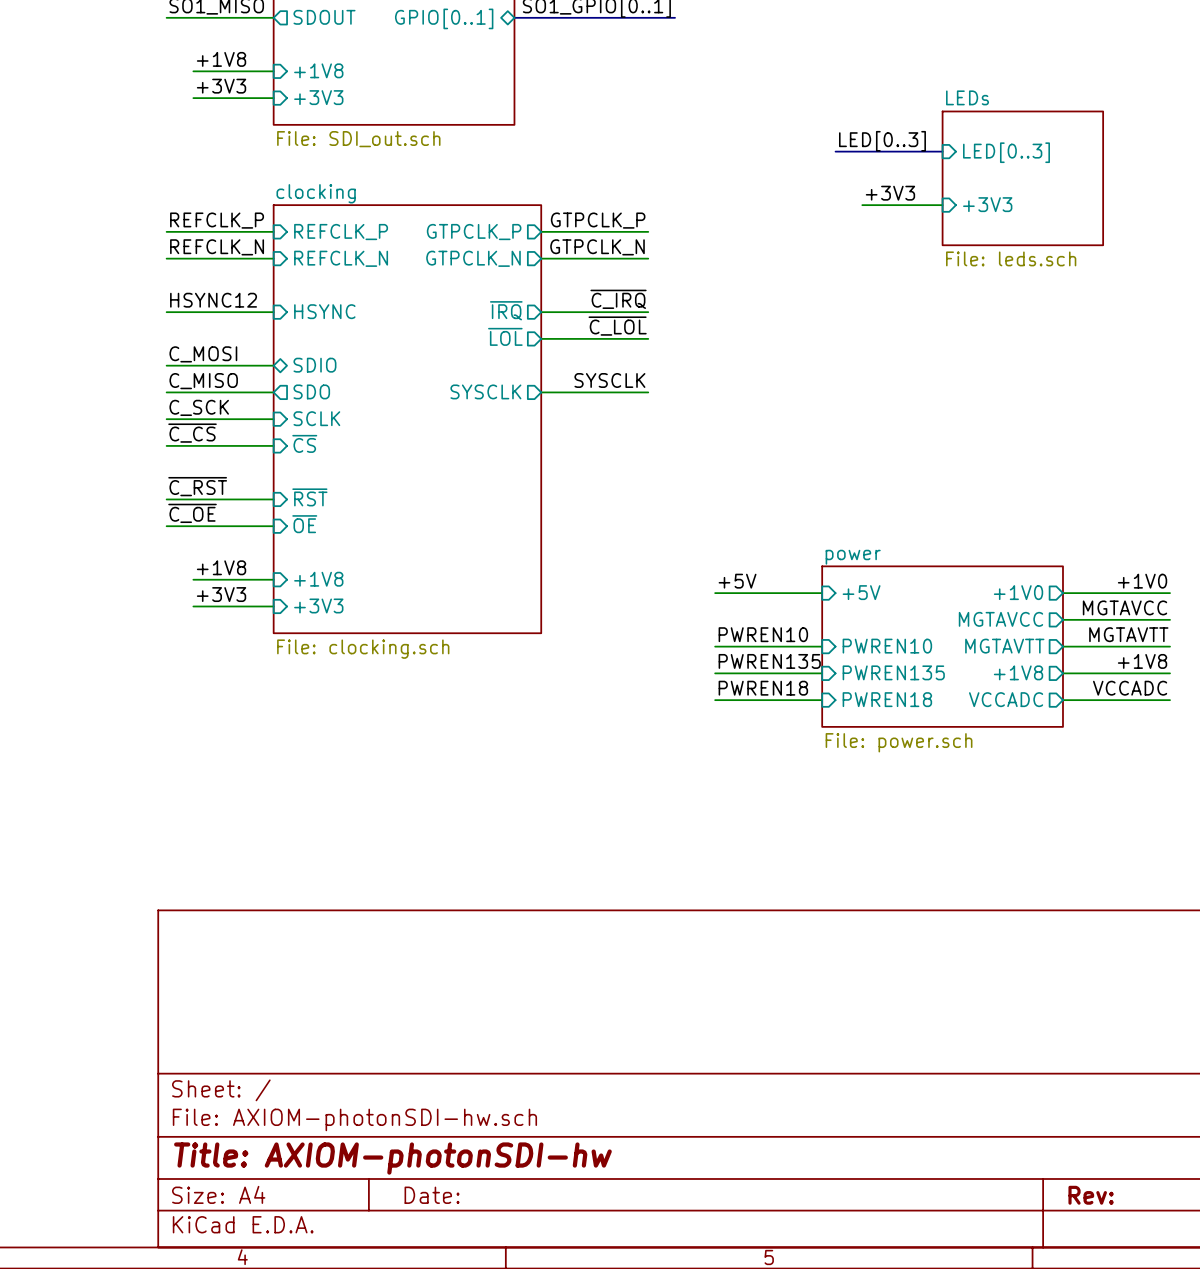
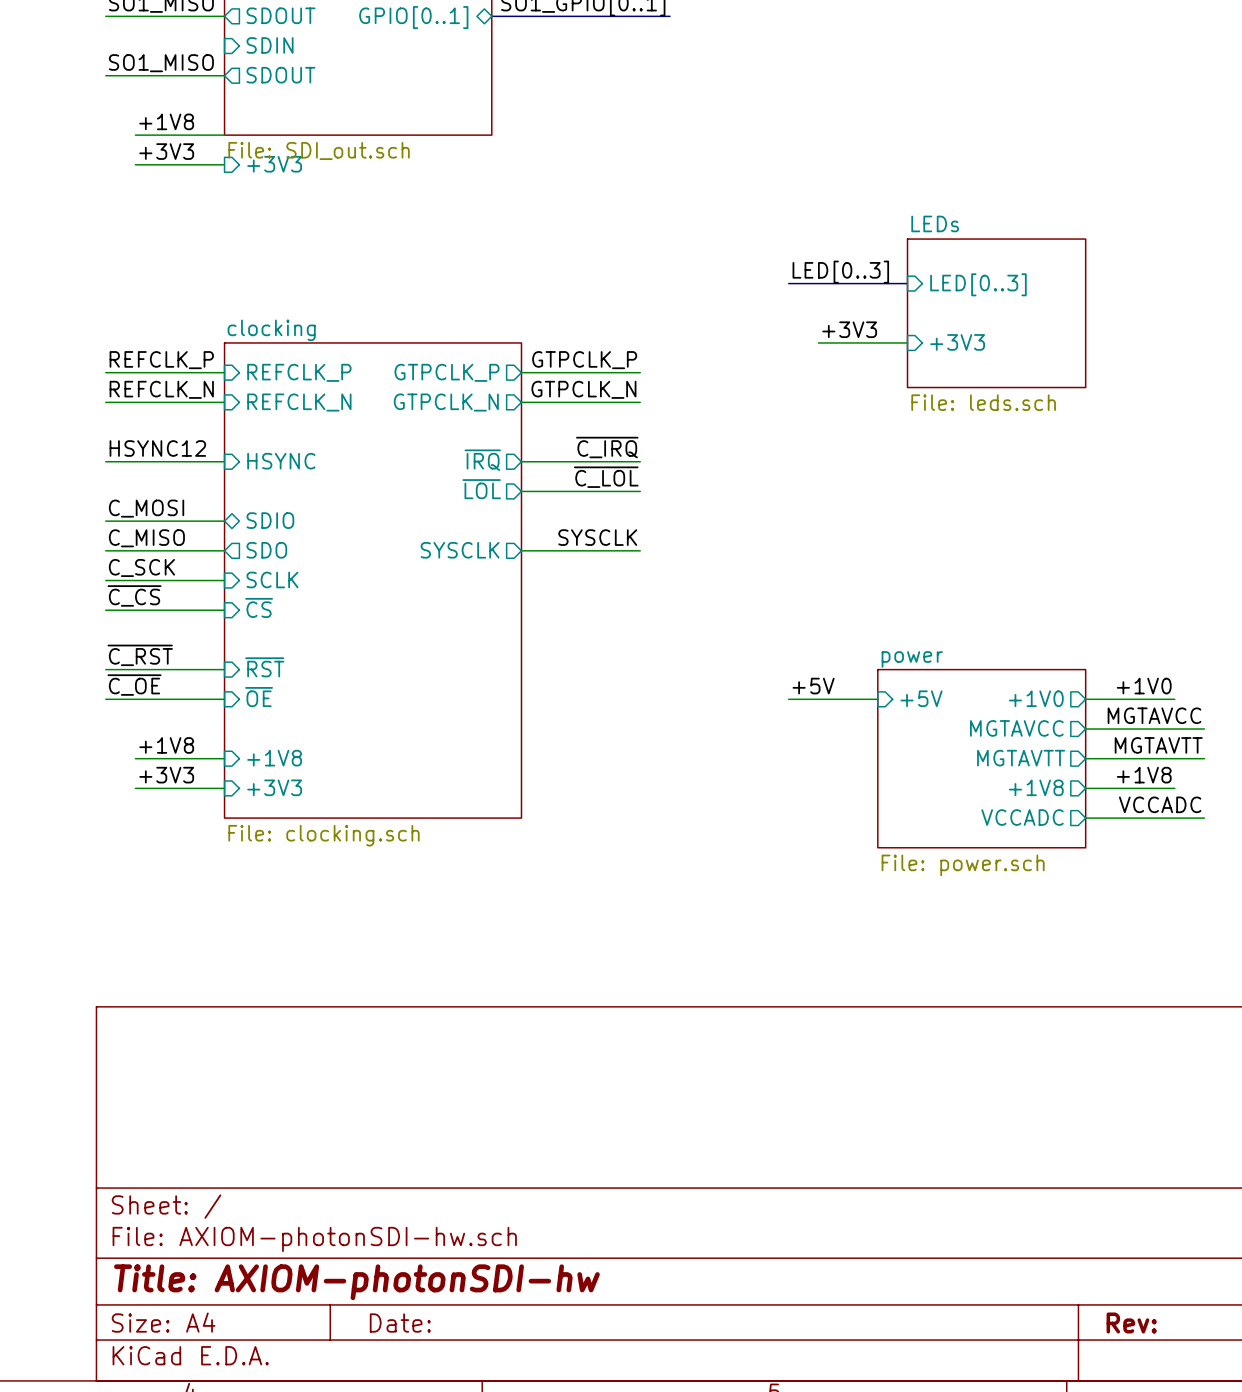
sheet pin: none -> SDIN (270, 45)
label position: +1V8 (221, 59) -> +1V8 (166, 121)
label: none -> SO1_MISO (161, 63)
sheet pin shape: input (318, 70) -> output (280, 75)
sheet pin: +1V8 (318, 70) -> SDOUT (280, 75)
wire: none -> (105, 75) (135, 75)
label position: +3V3 (221, 86) -> +3V3 (166, 151)
sheet pin position: +3V3 (318, 97) -> +3V3 (274, 164)
wire: (193, 98) (273, 98) -> (135, 135) (224, 135)
label position: LED[0..3] (882, 141) -> LED[0..3] (840, 272)
wire: none -> (135, 164) (224, 164)
bus: (835, 151) (942, 151) -> (788, 283) (907, 283)
sheet pin position: LED[0..3] (1006, 152) -> LED[0..3] (978, 284)
sheet LEDs position: (1022, 178) -> (996, 313)
label position: +3V3 (890, 193) -> +3V3 (849, 329)
sheet pin position: +3V3 (987, 204) -> +3V3 (957, 342)
wire: (862, 205) (942, 205) -> (818, 342) (907, 342)
label position: REFCLK_P (217, 220) -> REFCLK_P (161, 360)
label: GTPCLK_P (598, 220) -> none
wire: (166, 231) (273, 231) -> (105, 372) (224, 372)
wire: (541, 231) (648, 231) -> (521, 491) (640, 491)
sheet pin position: REFCLK_P (341, 232) -> REFCLK_P (299, 372)
sheet pin: GTPCLK_P (474, 232) -> none
label: REFCLK_N (217, 247) -> none
label position: GTPCLK_N (597, 247) -> GTPCLK_N (583, 389)
wire: (166, 258) (273, 258) -> none
sheet pin: REFCLK_N (341, 258) -> none
sheet pin position: GTPCLK_N (473, 258) -> GTPCLK_N (446, 402)
wire: (541, 258) (648, 258) -> (521, 402) (640, 402)
label position: ~{C_IRQ} (618, 299) -> ~{C_IRQ} (607, 447)
label: HSYNC12 (213, 300) -> none
sheet pin position: ~{IRQ} (506, 310) -> ~{IRQ} (482, 460)
sheet pin: HSYNC (324, 311) -> none
wire: (166, 312) (273, 312) -> (105, 521) (224, 521)
wire: (541, 312) (648, 312) -> (521, 461) (640, 461)
label: ~{C_LOL} (617, 326) -> GTPCLK_P (584, 360)
sheet pin: ~{LOL} (505, 336) -> GTPCLK_P (447, 372)
label: C_MOSI (203, 354) -> REFCLK_N (161, 389)
sheet pin shape: bidirectional (314, 365) -> input (299, 402)
sheet pin: SDIO (314, 365) -> REFCLK_N (299, 402)
label position: SYSCLK (609, 380) -> SYSCLK (597, 537)
label: C_MISO (203, 381) -> none
sheet pin: SDO (311, 391) -> none
sheet pin position: SYSCLK (485, 391) -> SYSCLK (460, 550)
wire: (166, 392) (273, 392) -> (105, 699) (224, 699)
wire: (541, 392) (648, 392) -> (521, 550) (640, 550)
label: C_SCK (199, 407) -> HSYNC12 (157, 448)
sheet pin: SCLK (316, 418) -> HSYNC (281, 461)
sheet clocking position: (407, 419) -> (373, 580)
label position: ~{C_CS} (192, 433) -> ~{C_CS} (134, 595)
label: none -> ~{C_LOL} (606, 477)
sheet pin position: ~{CS} (304, 443) -> ~{CS} (259, 607)
sheet pin: none -> ~{LOL} (481, 489)
wire: (166, 445) (273, 445) -> (105, 610) (224, 610)
label: none -> C_MOSI (146, 508)
sheet pin: none -> SDIO (270, 520)
label: ~{C_RST} (197, 486) -> C_MISO (146, 538)
sheet pin shape: input (309, 497) -> output (266, 550)
sheet pin: ~{RST} (309, 497) -> SDO (266, 550)
label: ~{C_OE} (192, 513) -> C_SCK (141, 567)
sheet pin: ~{OE} (304, 524) -> SCLK (272, 579)
label position: +1V8 (221, 567) -> +1V8 (166, 745)
wire: (193, 579) (273, 579) -> (135, 758) (224, 758)
sheet pin position: +1V8 (318, 579) -> +1V8 (274, 758)
label position: +5V (737, 581) -> +5V (813, 686)
label position: +1V0 (1142, 581) -> +1V0 (1144, 686)
sheet pin position: +5V (861, 592) -> +5V (921, 698)
sheet pin position: +1V0 (1018, 592) -> +1V0 (1036, 698)
label: none -> ~{C_RST} (140, 655)
wire: (715, 593) (822, 593) -> none
wire: (1062, 593) (1170, 593) -> none
label position: +3V3 (221, 594) -> +3V3 (166, 775)
sheet pin: +3V3 (318, 605) -> ~{RST} (264, 667)
wire: none -> (105, 669) (135, 669)
label position: MGTAVCC (1125, 607) -> MGTAVCC (1154, 715)
sheet pin position: MGTAVCC (1000, 619) -> MGTAVCC (1016, 728)
wire: (1062, 619) (1170, 619) -> (1085, 728) (1204, 728)
label: none -> ~{C_OE} (134, 685)
sheet pin: none -> ~{OE} (259, 697)
wire: none -> (788, 699) (877, 699)
wire: none -> (1085, 699) (1174, 699)
label: PWREN10 (763, 634) -> none
label position: MGTAVTT (1128, 634) -> MGTAVTT (1158, 745)
wire: (715, 646) (822, 646) -> none
sheet pin: PWREN10 (887, 646) -> none
sheet power: File: power.sch (942, 646) -> none
sheet pin position: MGTAVTT (1004, 646) -> MGTAVTT (1021, 758)
wire: (1062, 646) (1170, 646) -> (1085, 758) (1204, 758)
label: PWREN135 (769, 661) -> none
label position: +1V8 (1142, 661) -> +1V8 (1144, 775)
sheet pin: PWREN135 (893, 672) -> none
sheet pin position: +1V8 (1018, 672) -> +1V8 (1036, 787)
wire: (715, 673) (822, 673) -> none
wire: (1062, 673) (1170, 673) -> none
sheet power: none -> File: power.sch (981, 758)
label: PWREN18 (763, 688) -> none
label position: VCCADC (1130, 688) -> VCCADC (1160, 804)
sheet pin: PWREN18 (887, 699) -> none
sheet pin position: VCCADC (1006, 699) -> VCCADC (1022, 817)
wire: (715, 700) (822, 700) -> none
wire: (1062, 700) (1170, 700) -> (1085, 818) (1204, 818)
wire: none -> (135, 788) (224, 788)
sheet pin: none -> +3V3 (274, 787)
wire: none -> (1085, 788) (1174, 788)

